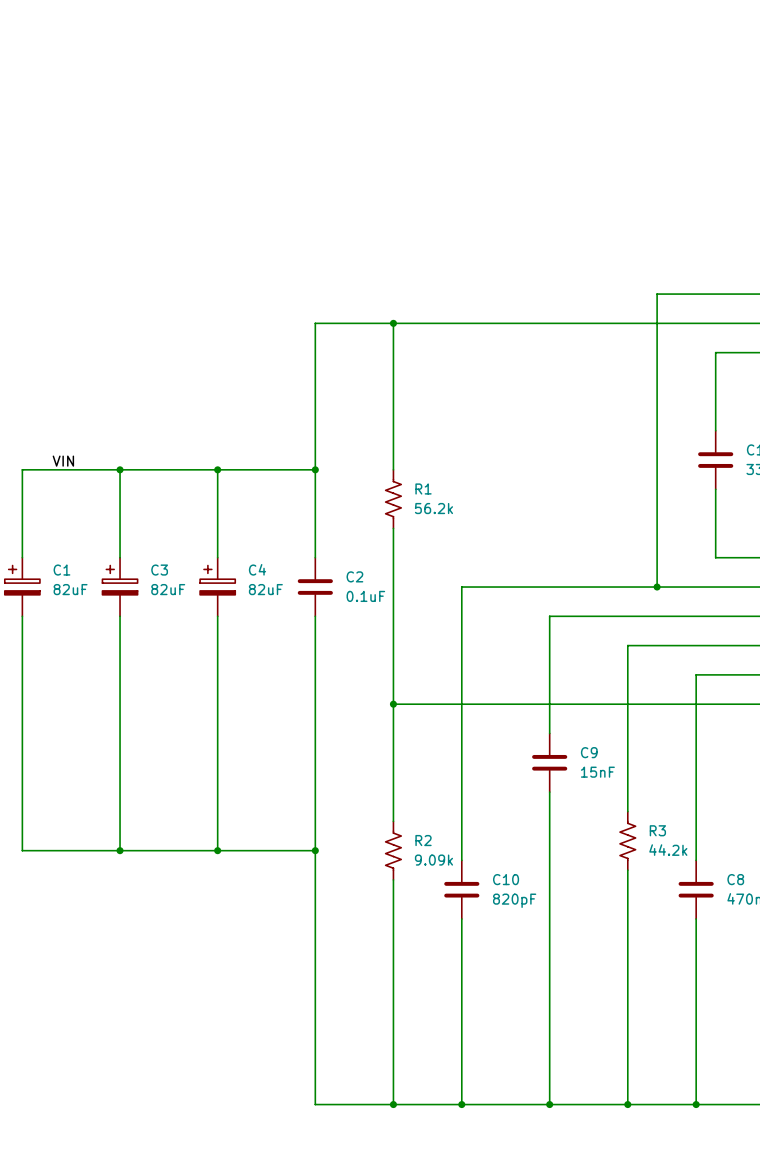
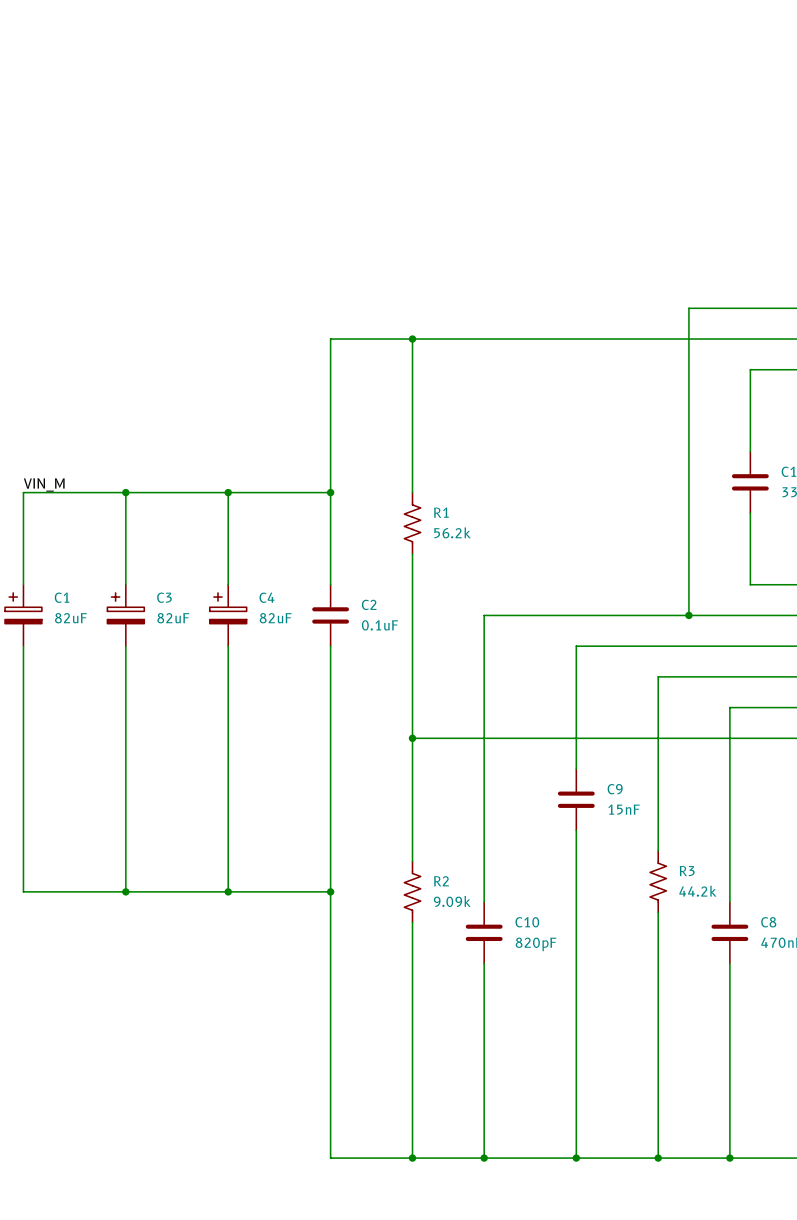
label: VIN (63, 461) -> VIN_M (44, 484)

